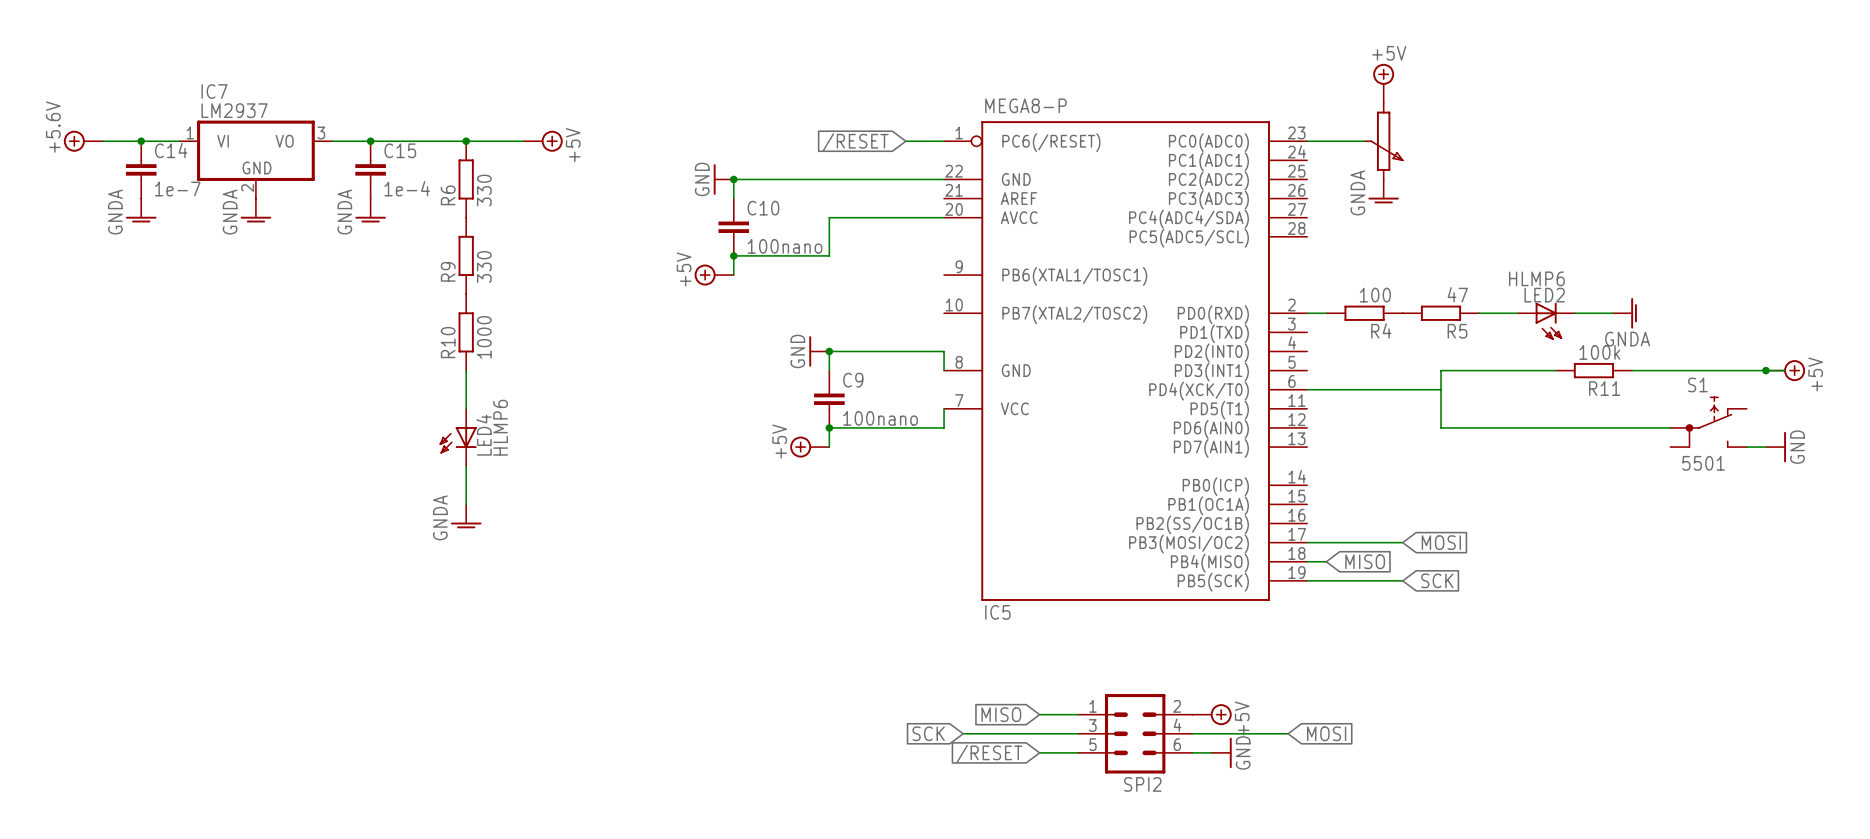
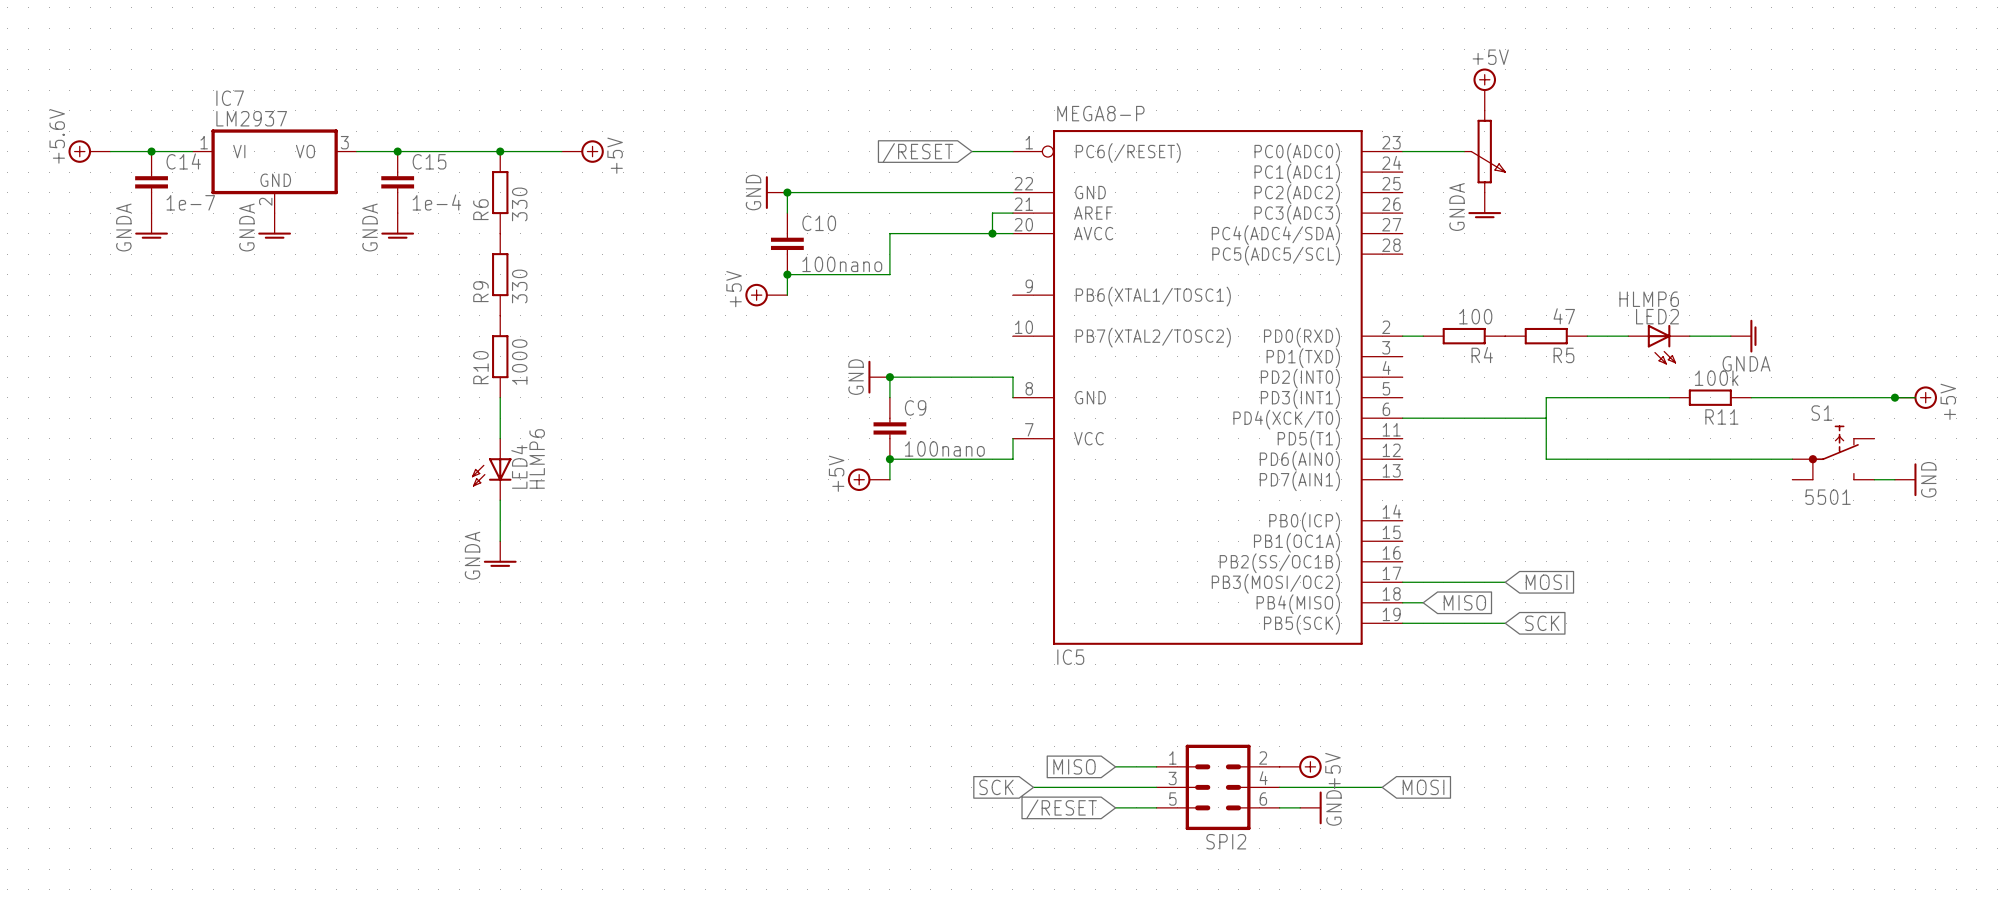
wire: none -> (1012, 213) (992, 213) (992, 233)
junction: none -> (992, 233)

